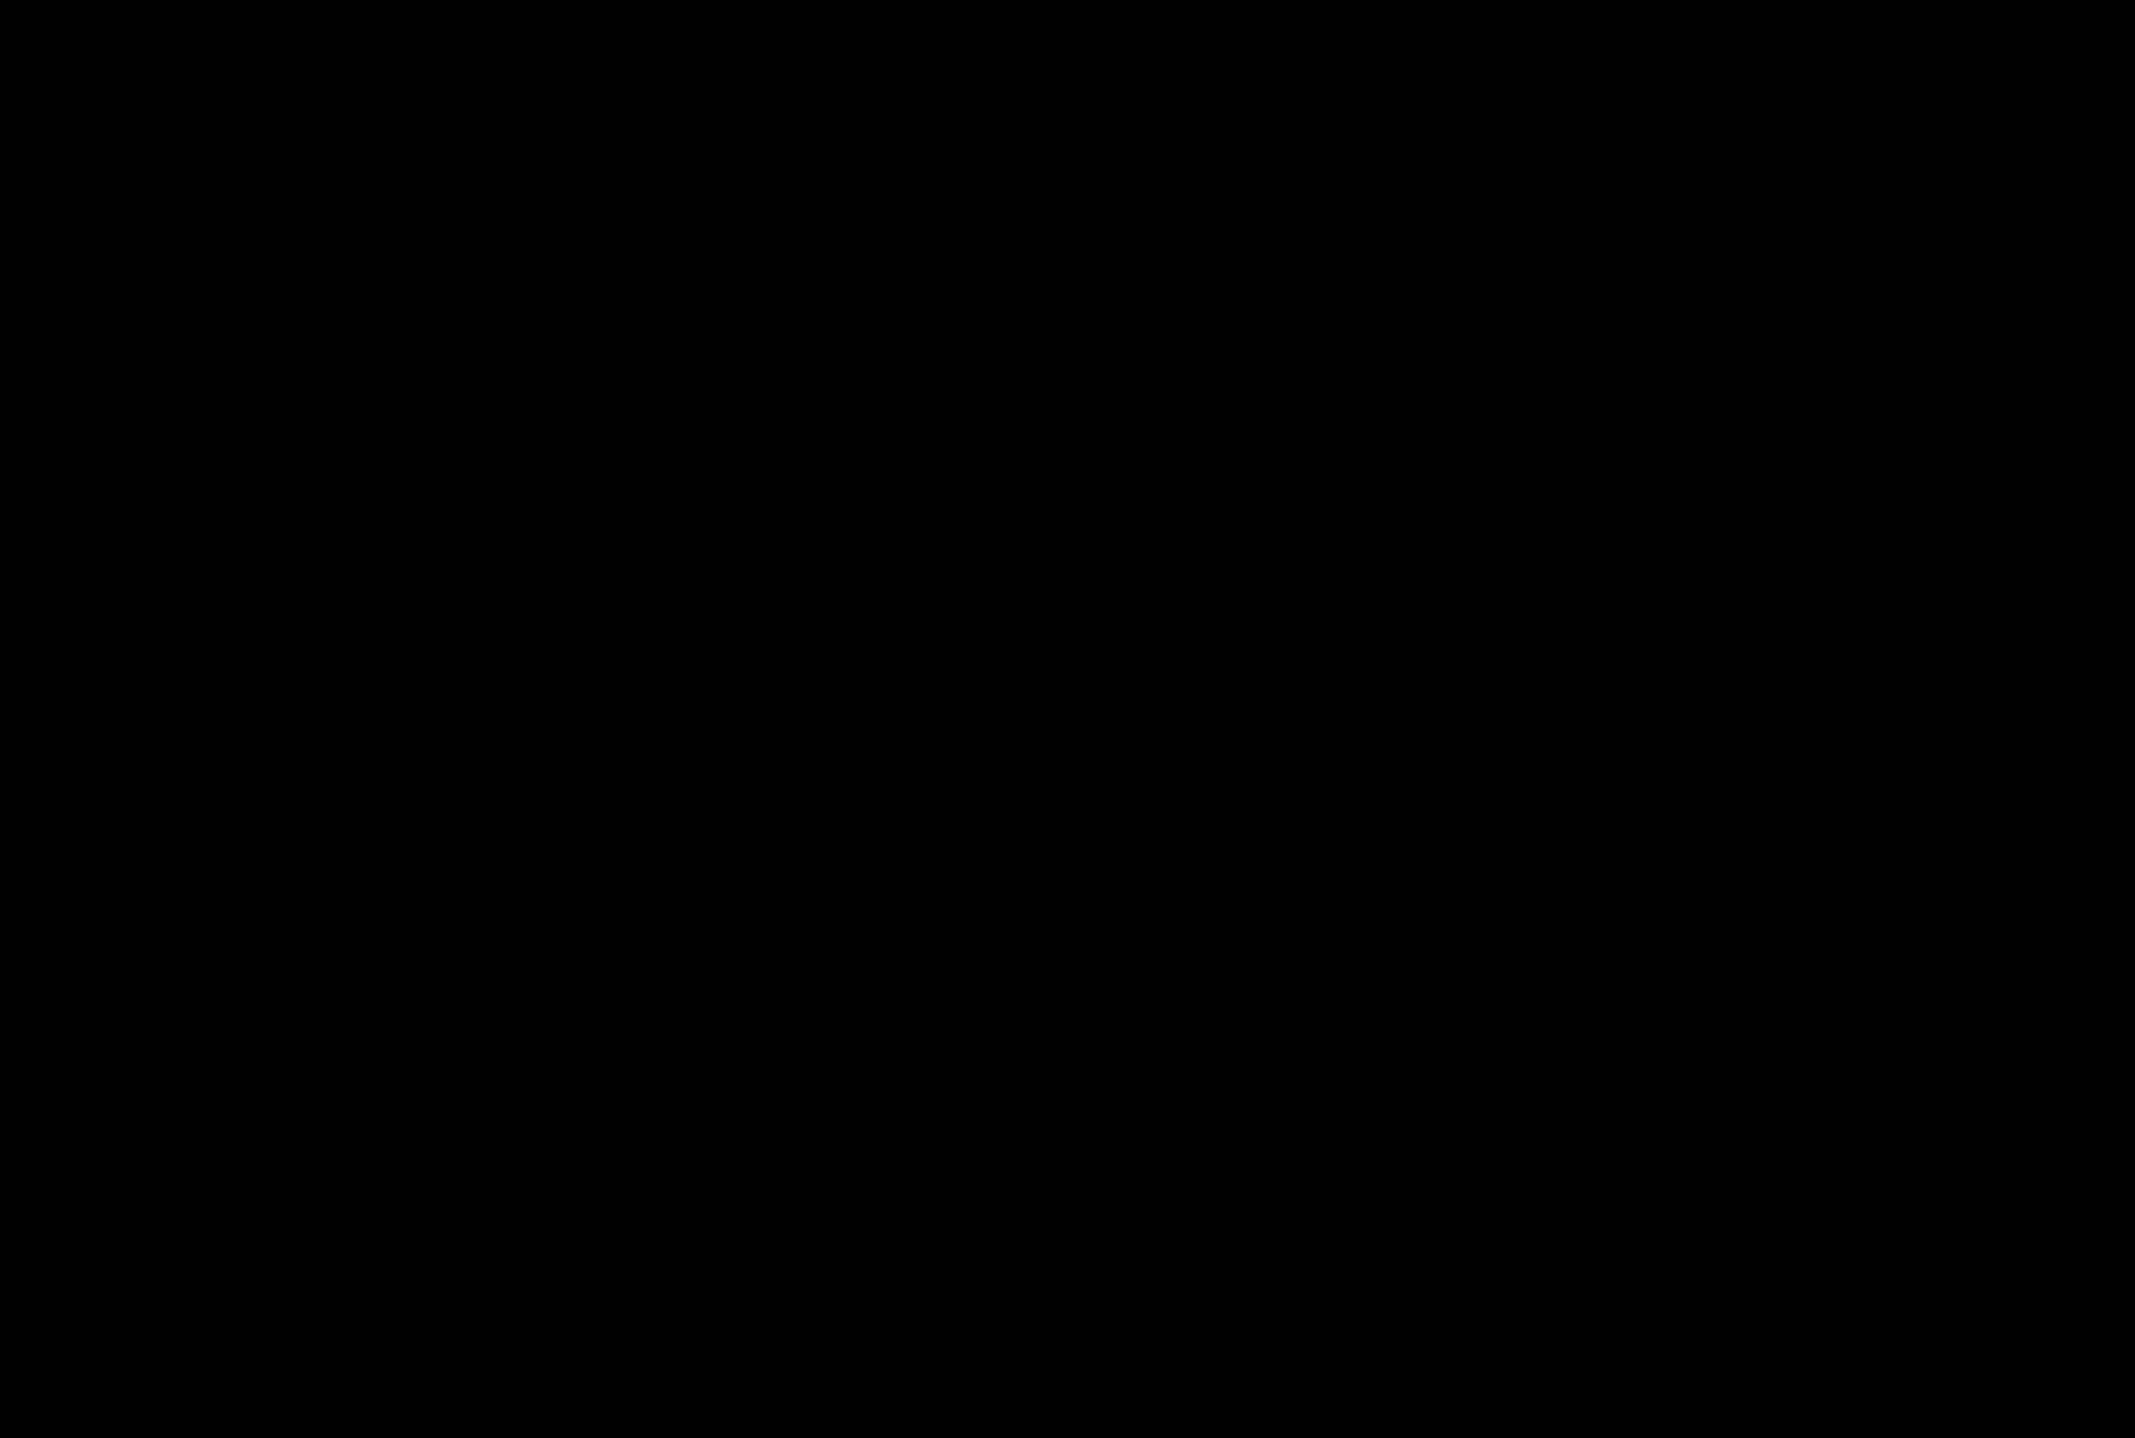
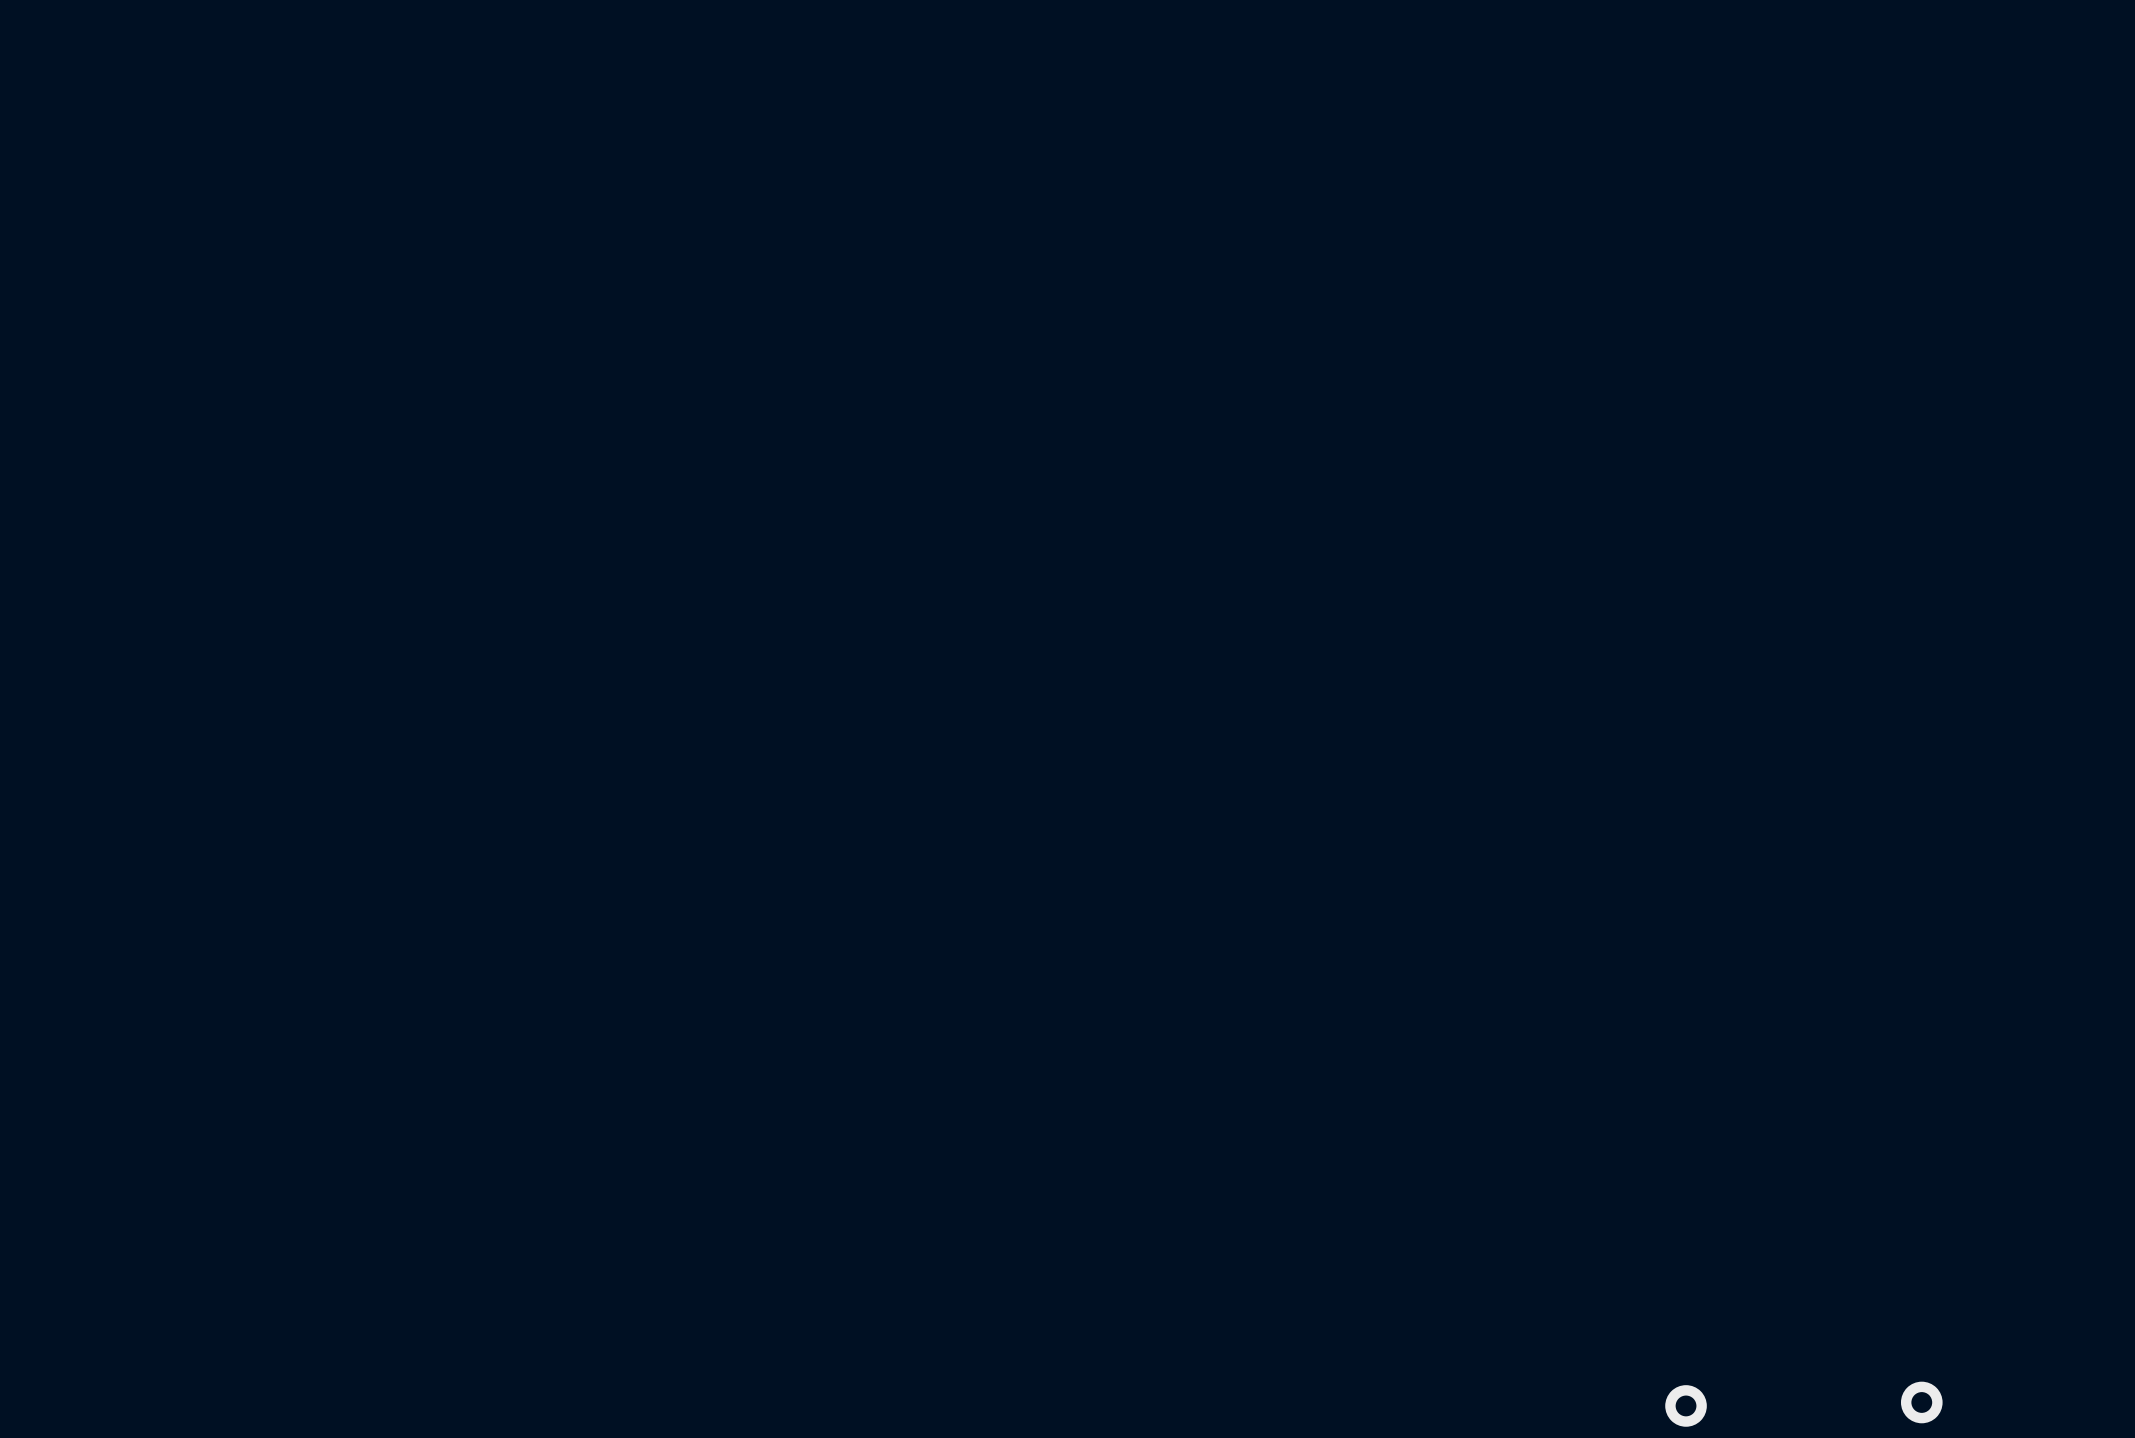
via: none -> (1921, 1402)
via: none -> (1686, 1405)

